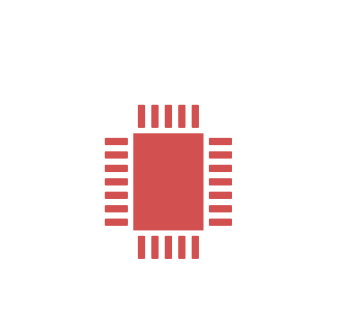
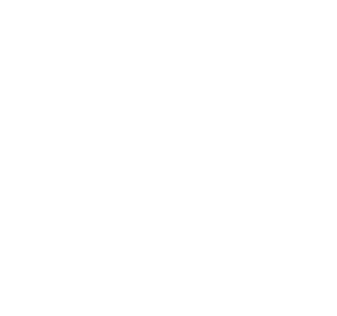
part: (168, 181) -> none

